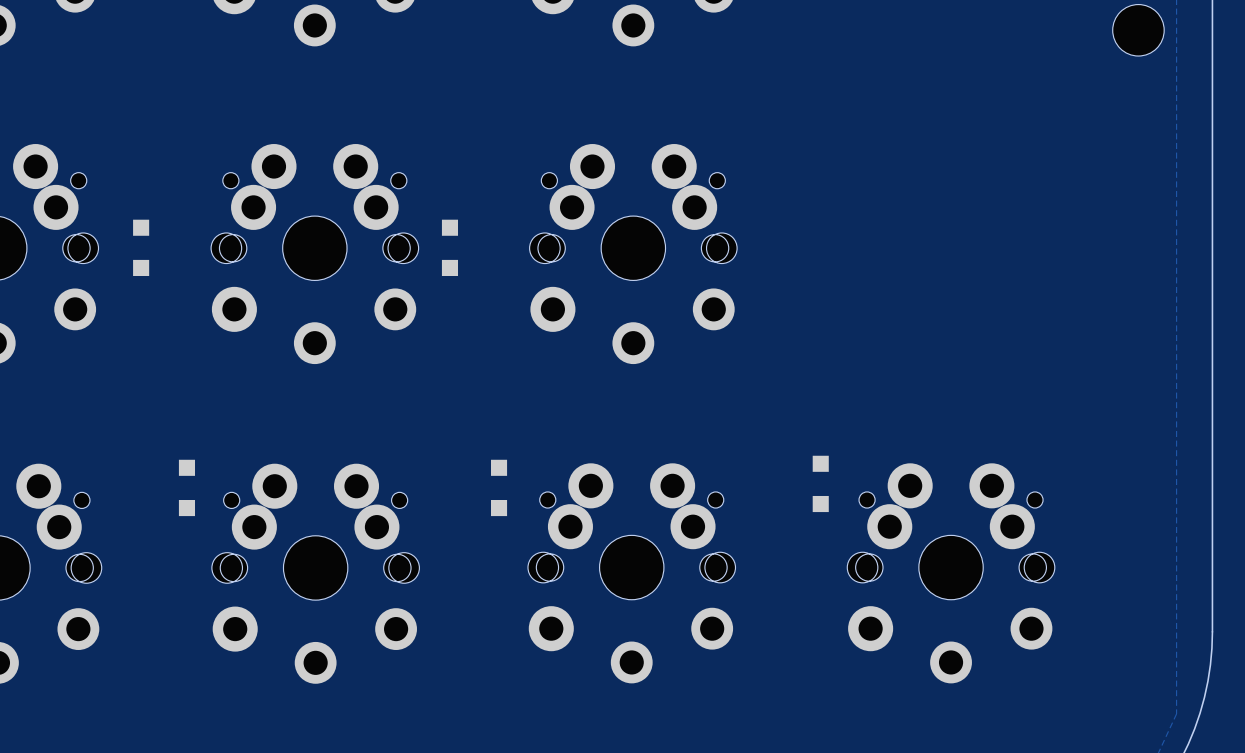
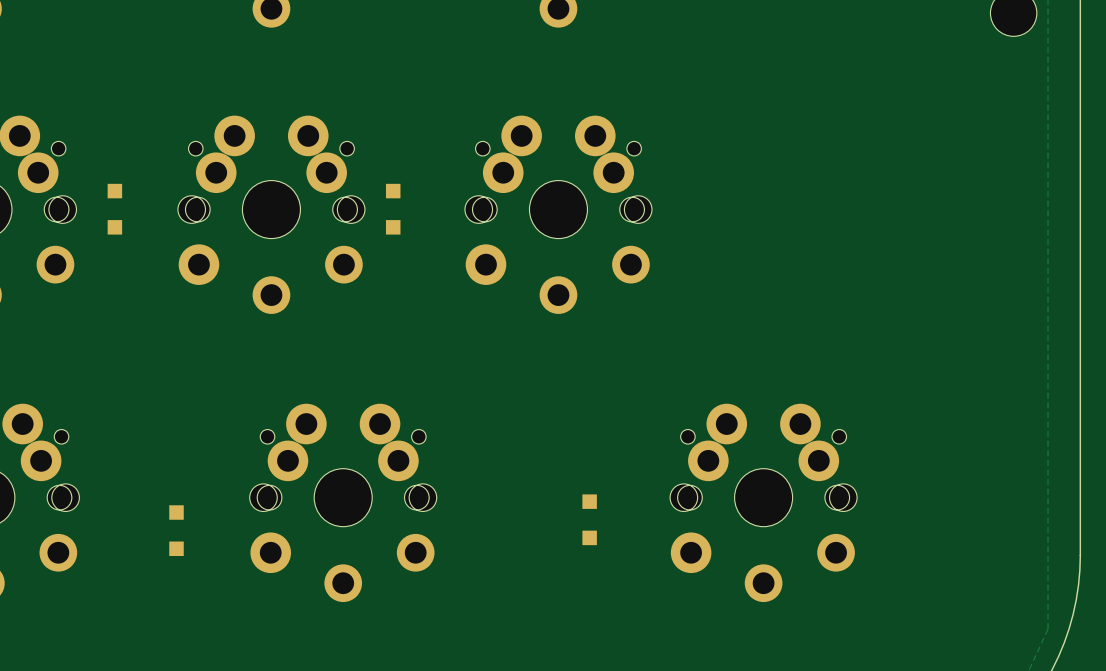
part: (820, 483) -> none
part position: (186, 487) -> (176, 530)
part: (499, 487) -> none
part position: (315, 573) -> (343, 502)
part: (631, 573) -> none
part position: (951, 573) -> (763, 502)
part: none -> (589, 519)

